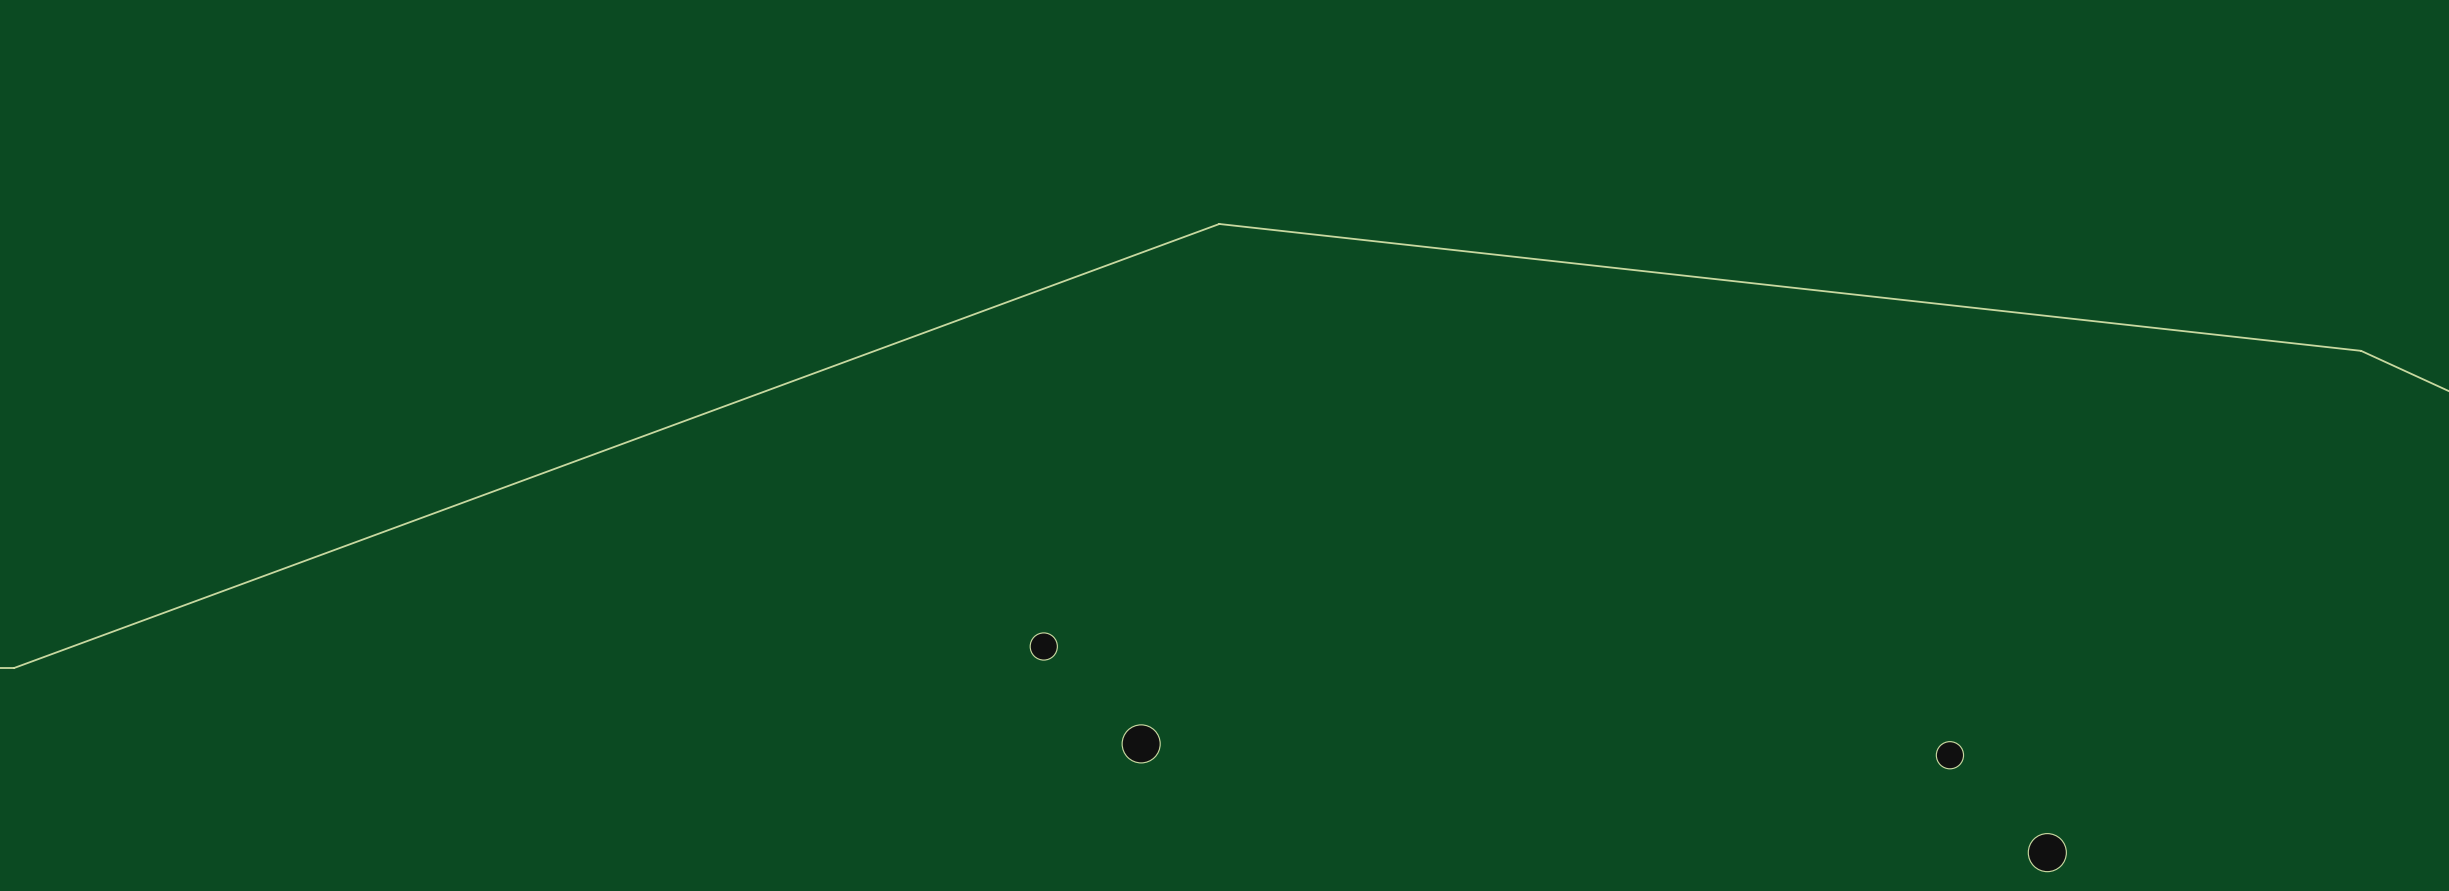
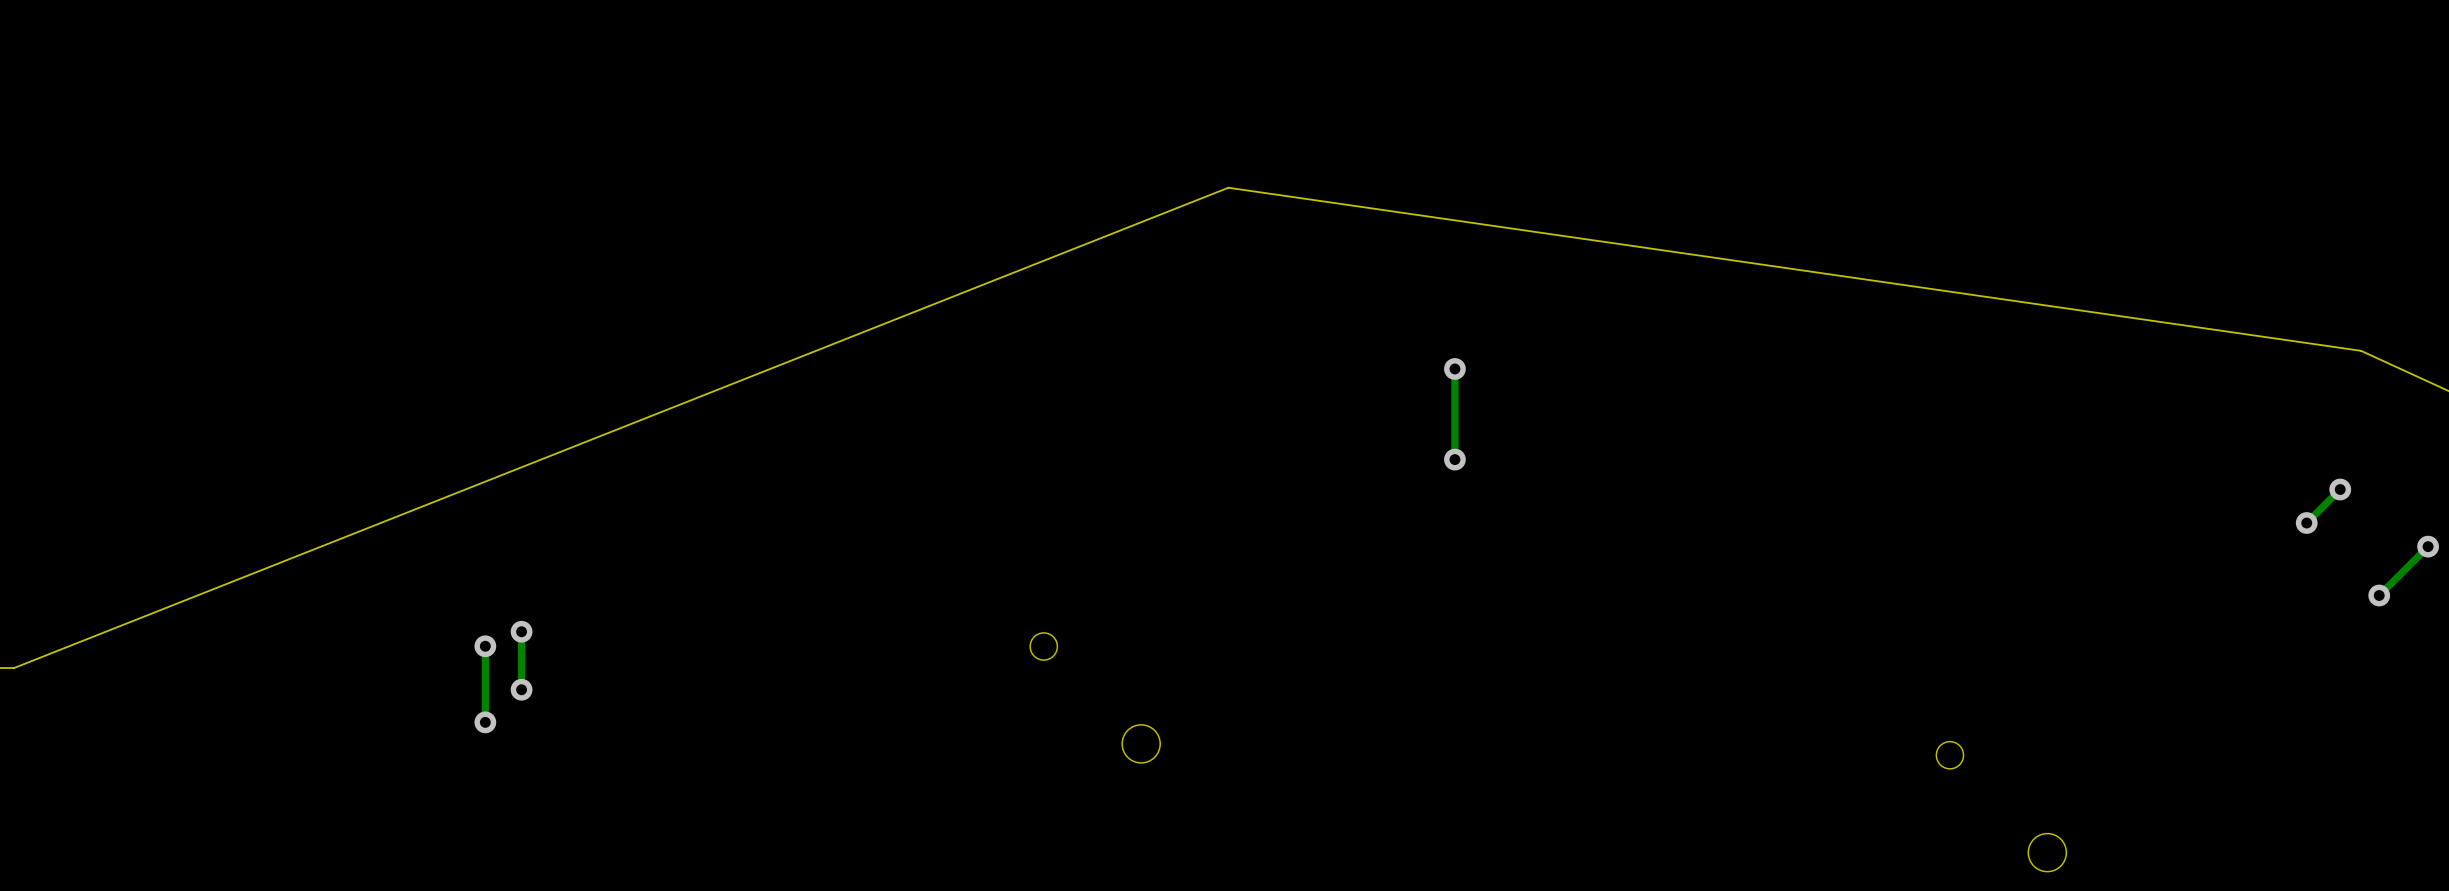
board edge: (2361, 350) (1219, 223) (14, 668) -> (2361, 350) (1228, 187) (14, 668)
track: none -> (1454, 368) (1454, 459)
via: none -> (1454, 368)
via: none -> (1454, 459)
track: none -> (2340, 489) (2306, 523)
via: none -> (2340, 489)
via: none -> (2306, 523)
track: none -> (2428, 546) (2379, 595)
via: none -> (2428, 546)
via: none -> (2379, 595)
track: none -> (521, 631) (521, 689)
via: none -> (521, 631)
track: none -> (485, 646) (485, 722)
via: none -> (485, 646)
via: none -> (521, 689)
via: none -> (485, 722)

